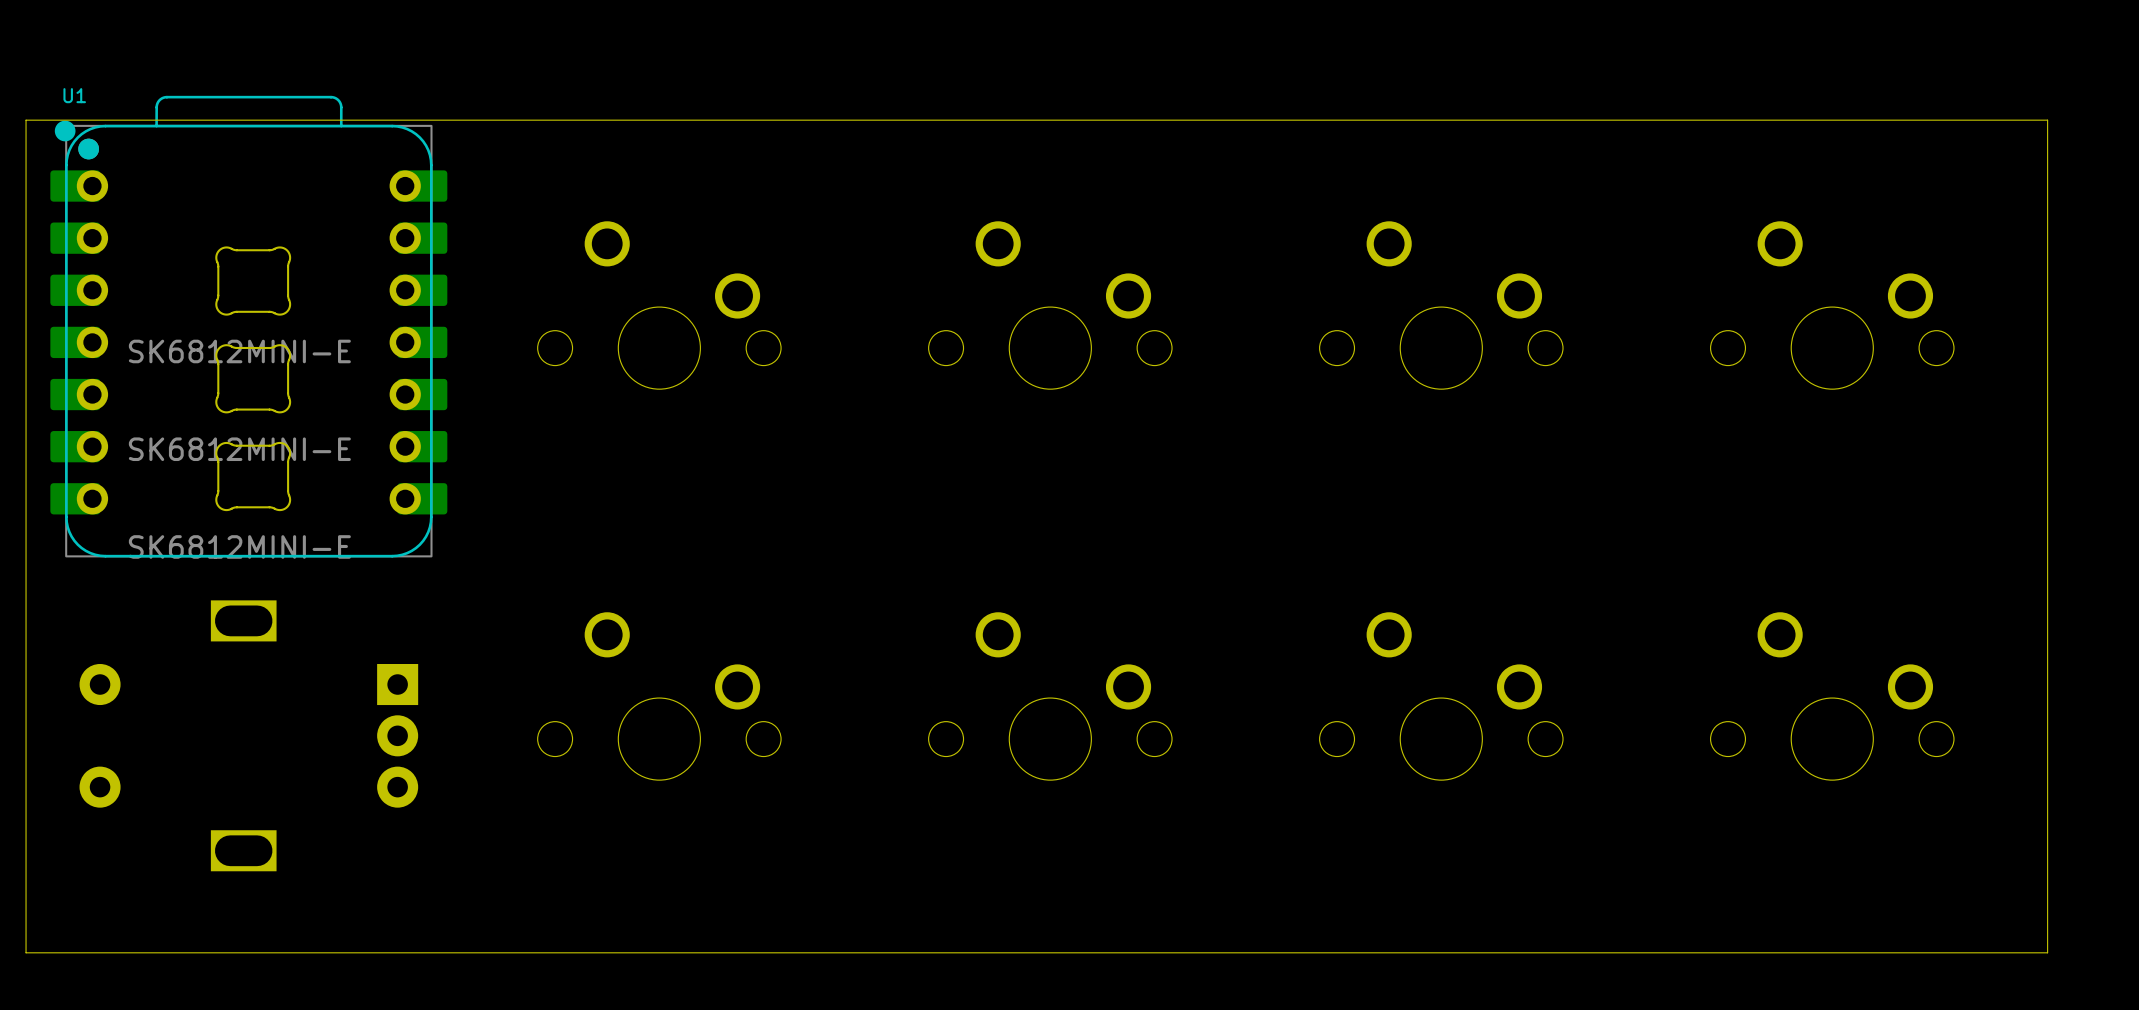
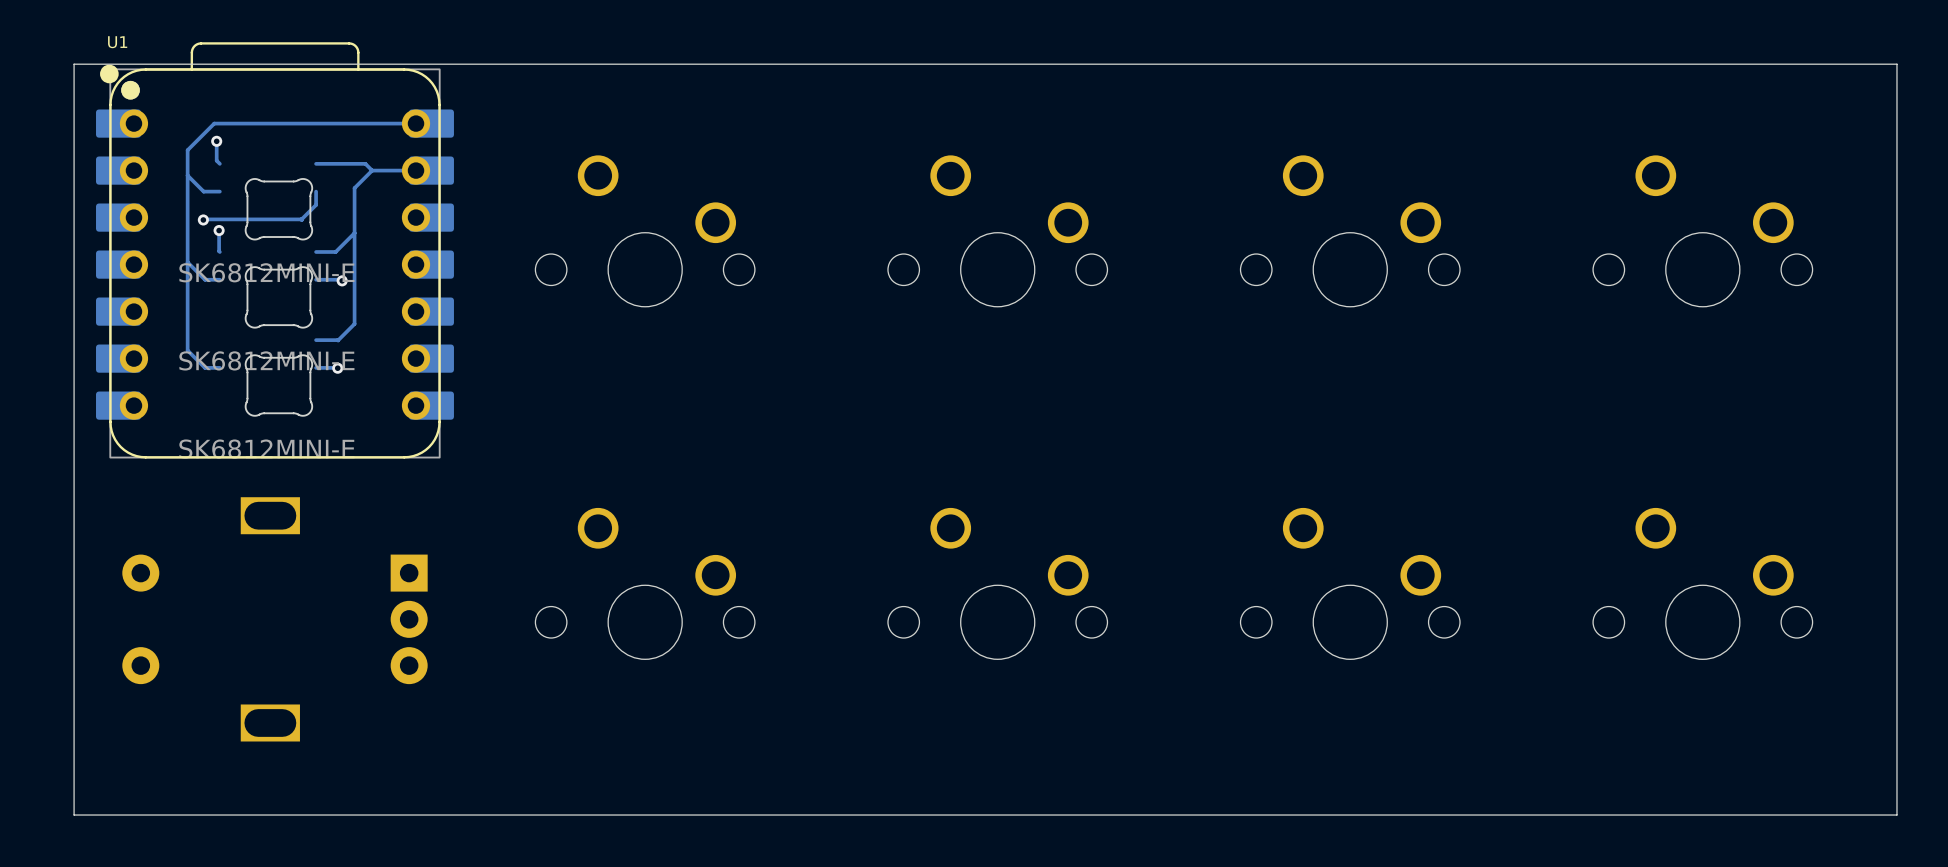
track: none -> (416, 123) (214, 123) (187, 150) (187, 350) (205, 367) (219, 367)
track: none -> (216, 141) (216, 160) (219, 163)
via: none -> (216, 141)
track: none -> (316, 163) (365, 163) (372, 170)
track: none -> (372, 170) (354, 188) (354, 323) (338, 340) (316, 340)
track: none -> (416, 170) (372, 170)
track: none -> (187, 175) (203, 191) (219, 191)
track: none -> (316, 191) (316, 204) (301, 219) (203, 219)
via: none -> (203, 219)
track: none -> (219, 230) (219, 251)
via: none -> (219, 230)
track: none -> (354, 233) (335, 251) (316, 251)
track: none -> (187, 262) (205, 279) (219, 279)
track: none -> (316, 279) (342, 280)
via: none -> (342, 280)
track: none -> (316, 367) (337, 368)
via: none -> (337, 368)

